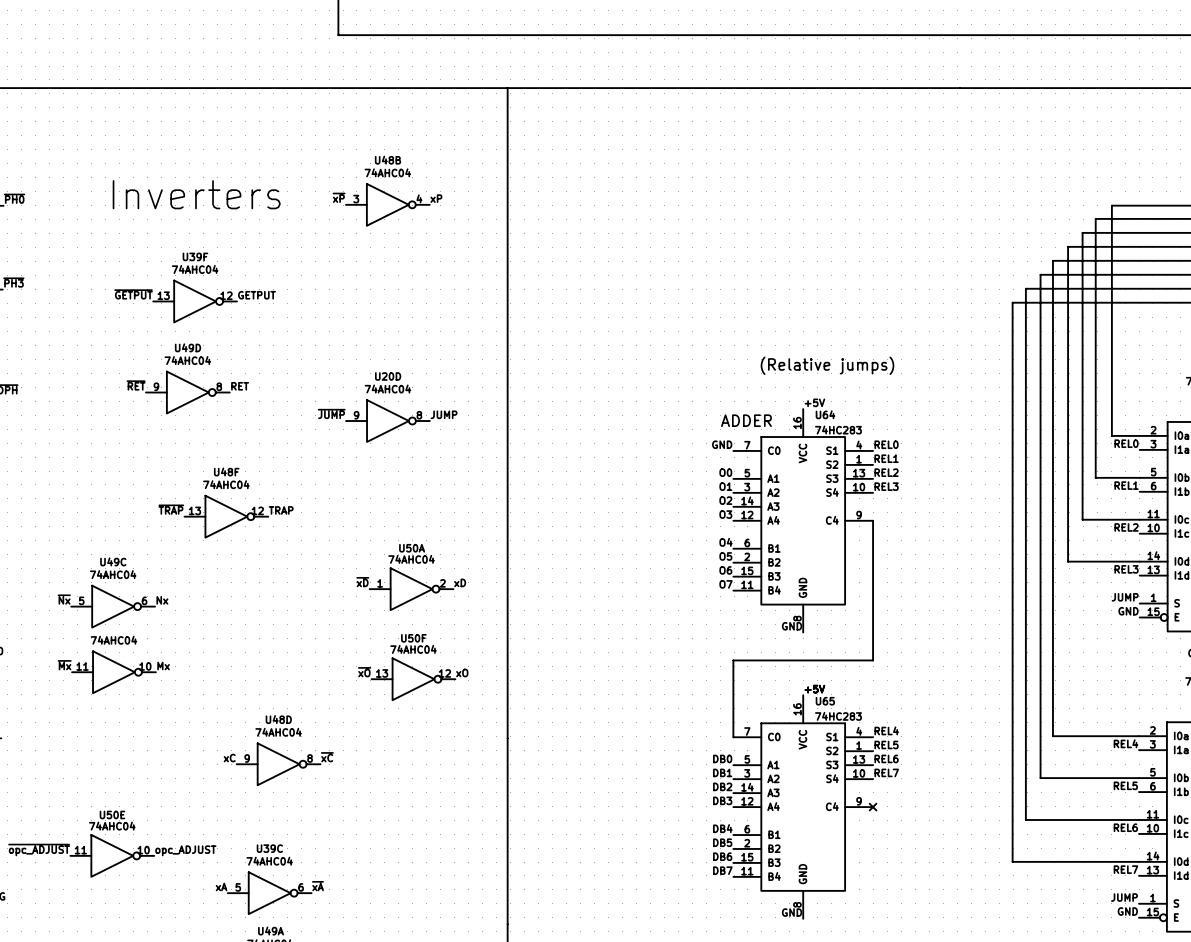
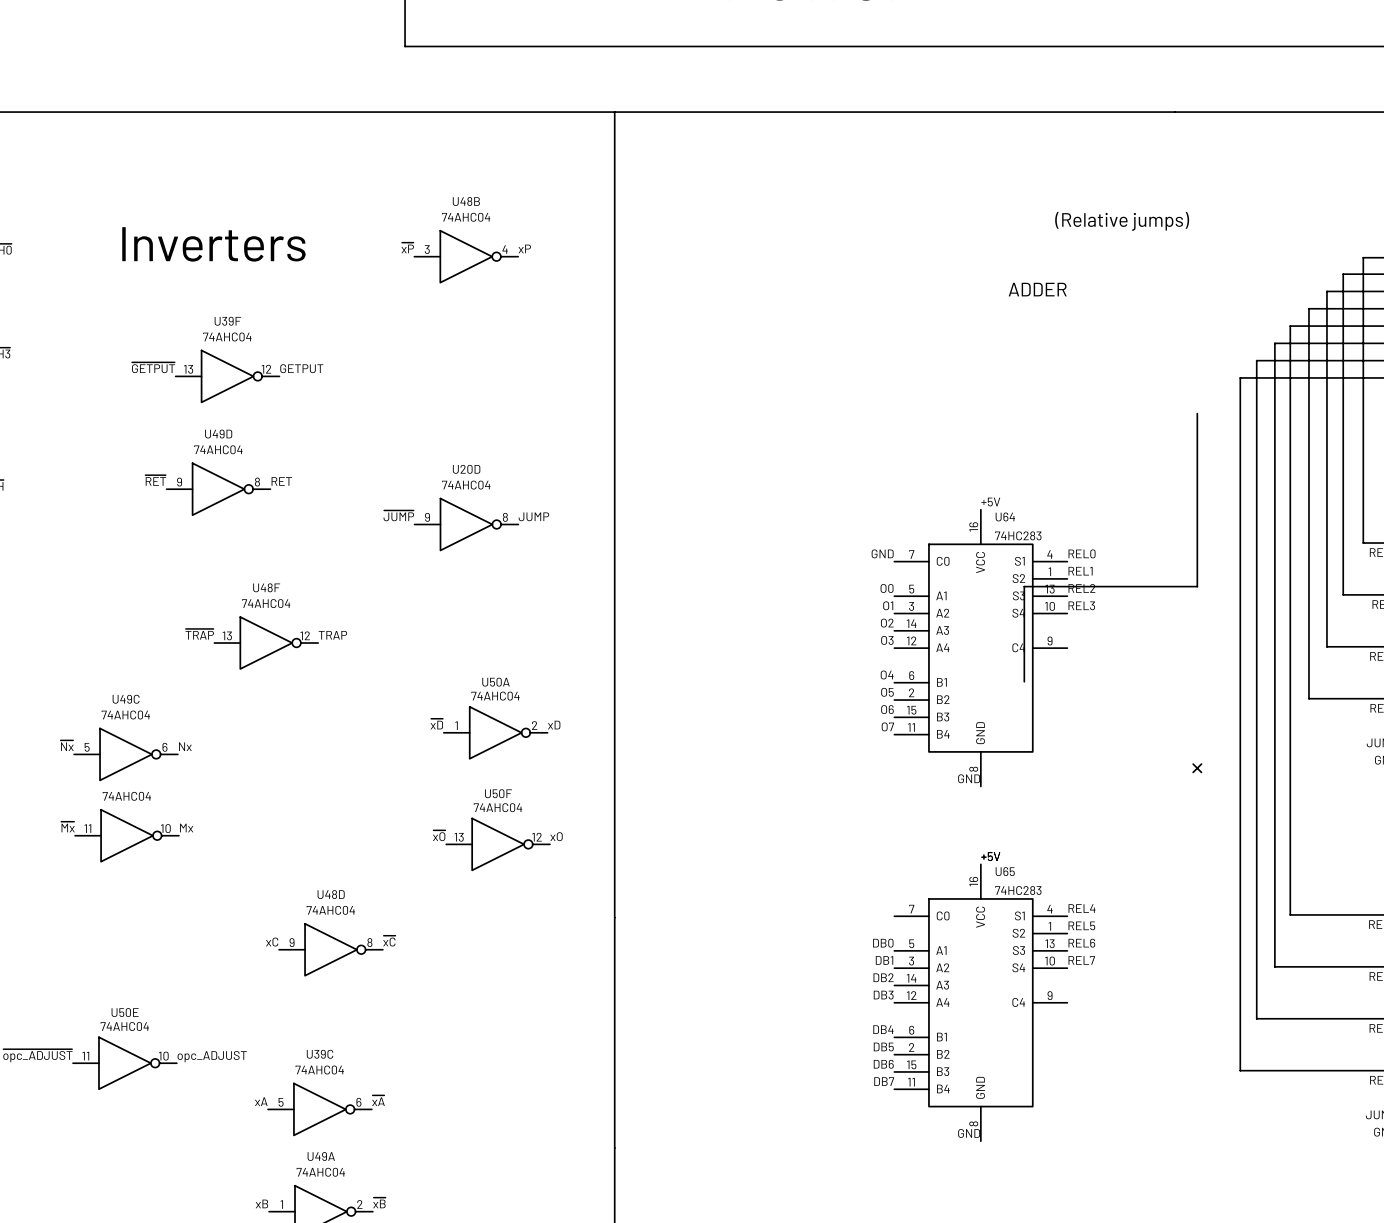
text: none -> (Relative jumps) (1122, 221)
text: none -> ADDER (1037, 289)
wire: none -> (1197, 413) (1197, 586) (1024, 586) (1024, 681)
text: (Relative jumps) (827, 365) -> none
text: ADDER (746, 420) -> none
wire: (873, 520) (873, 660) (733, 660) (733, 737) -> none
no-connect mark: none -> (1197, 768)
no-connect mark: (873, 807) -> none

